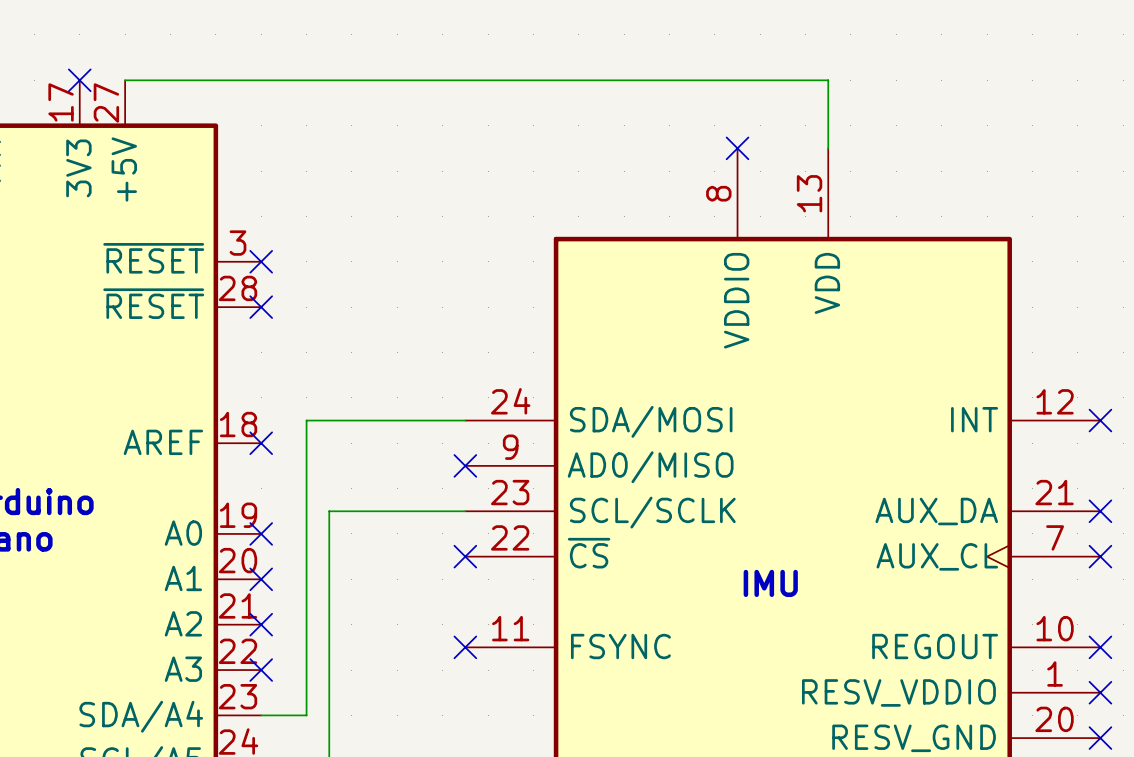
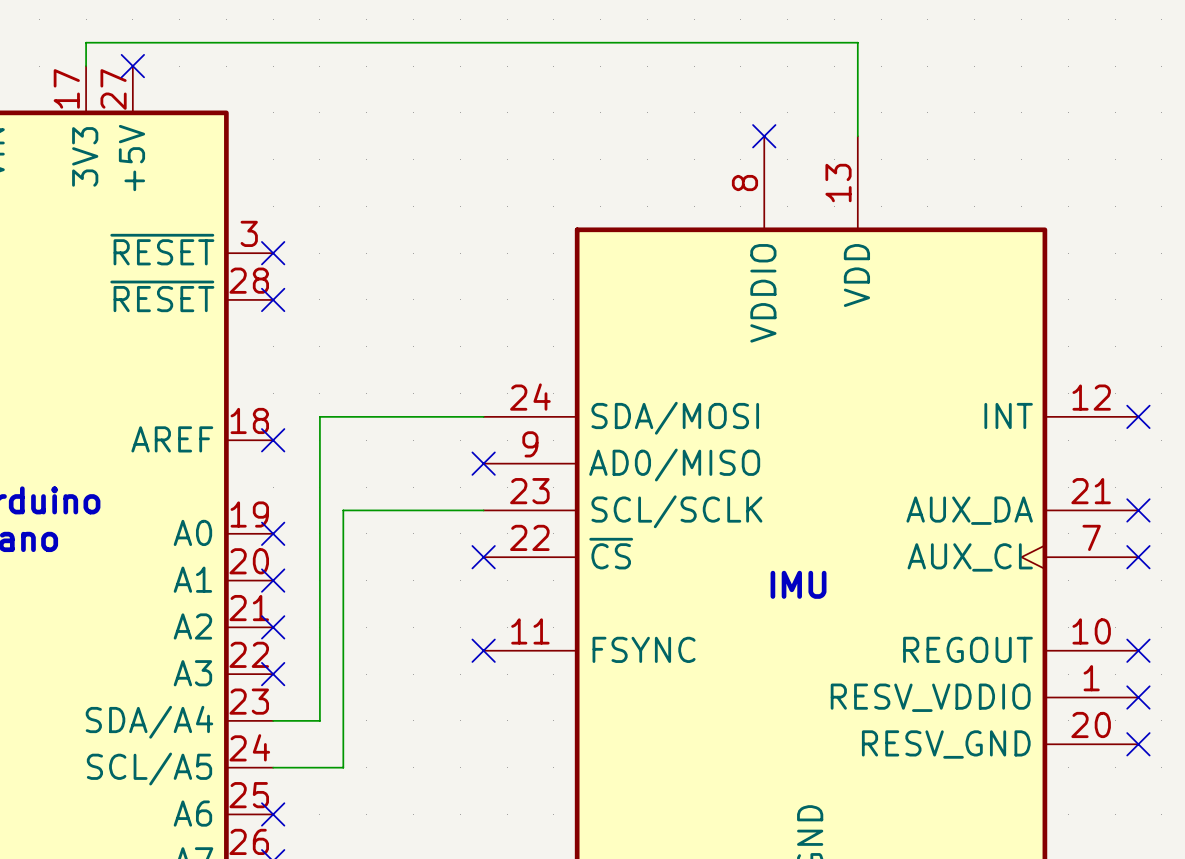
no-connect mark position: (79, 80) -> (132, 66)
wire: (125, 80) (828, 80) -> (86, 66) (86, 42) (857, 42) (857, 66)

